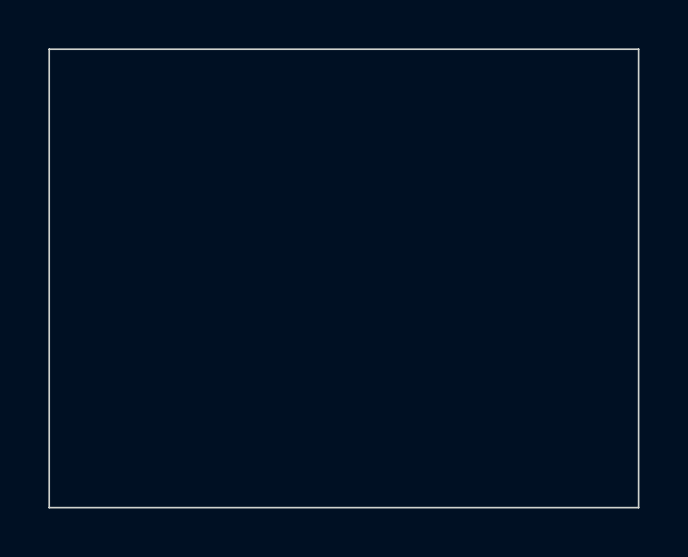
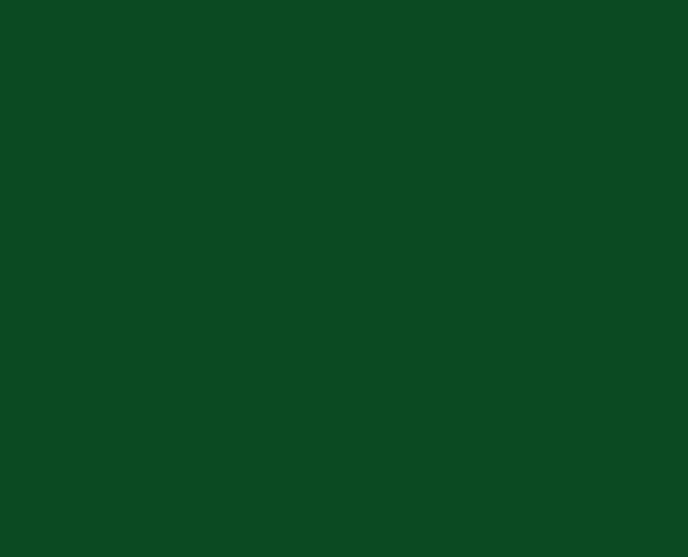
board edge: (49, 49) (638, 49) (638, 507) (49, 507) (49, 49) -> none

